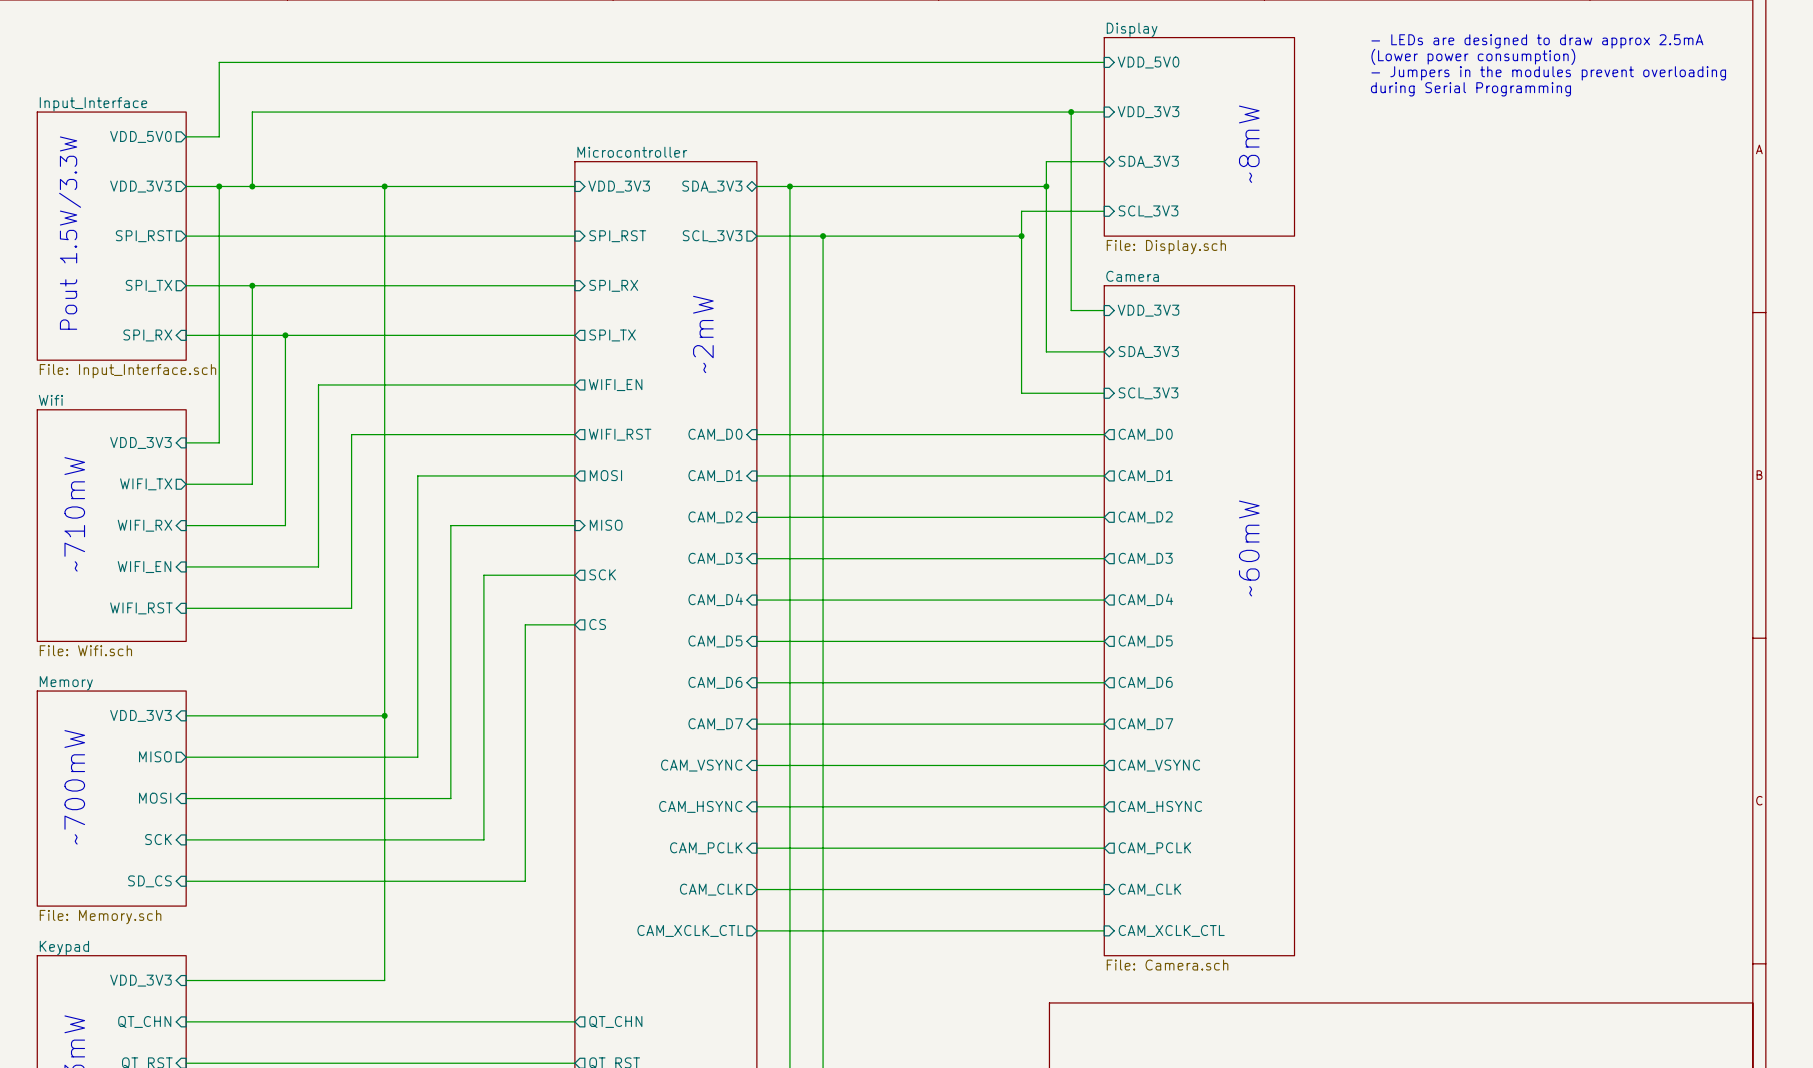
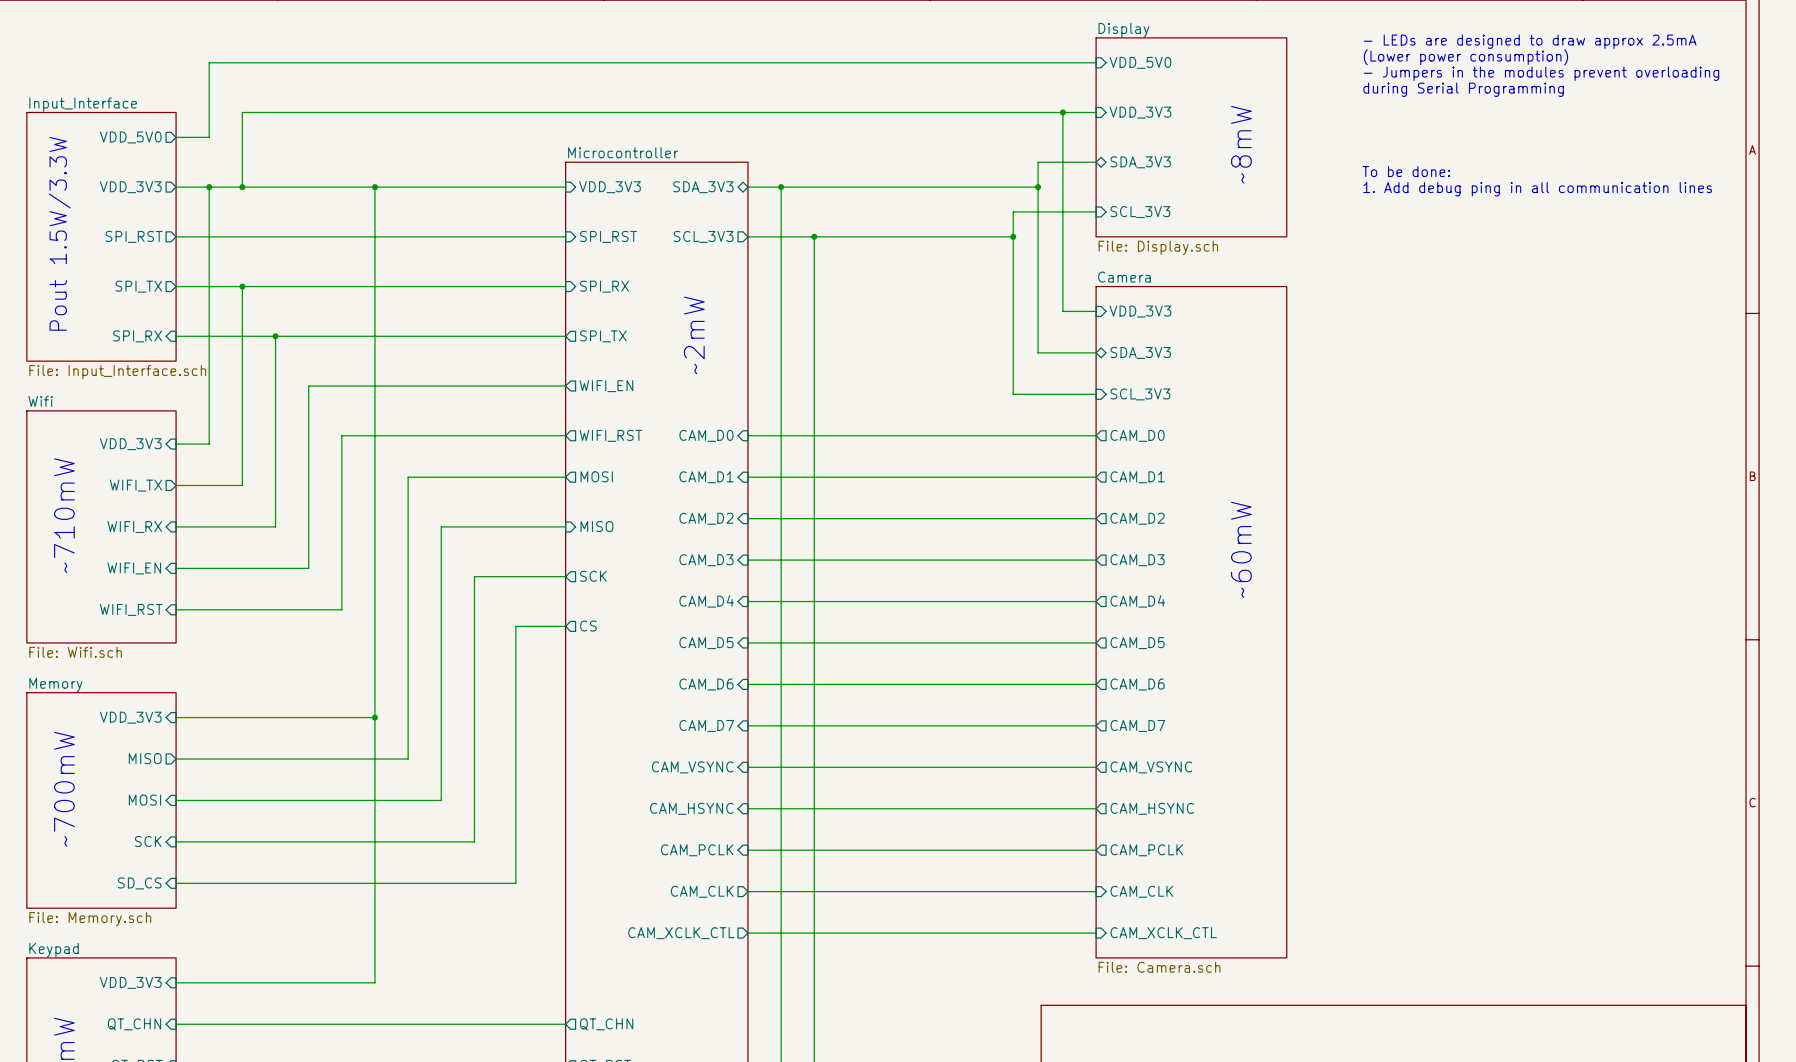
text: none -> To be done: (1406, 171)
text: none -> 1. Add debug ping in all communication lines (1537, 189)

